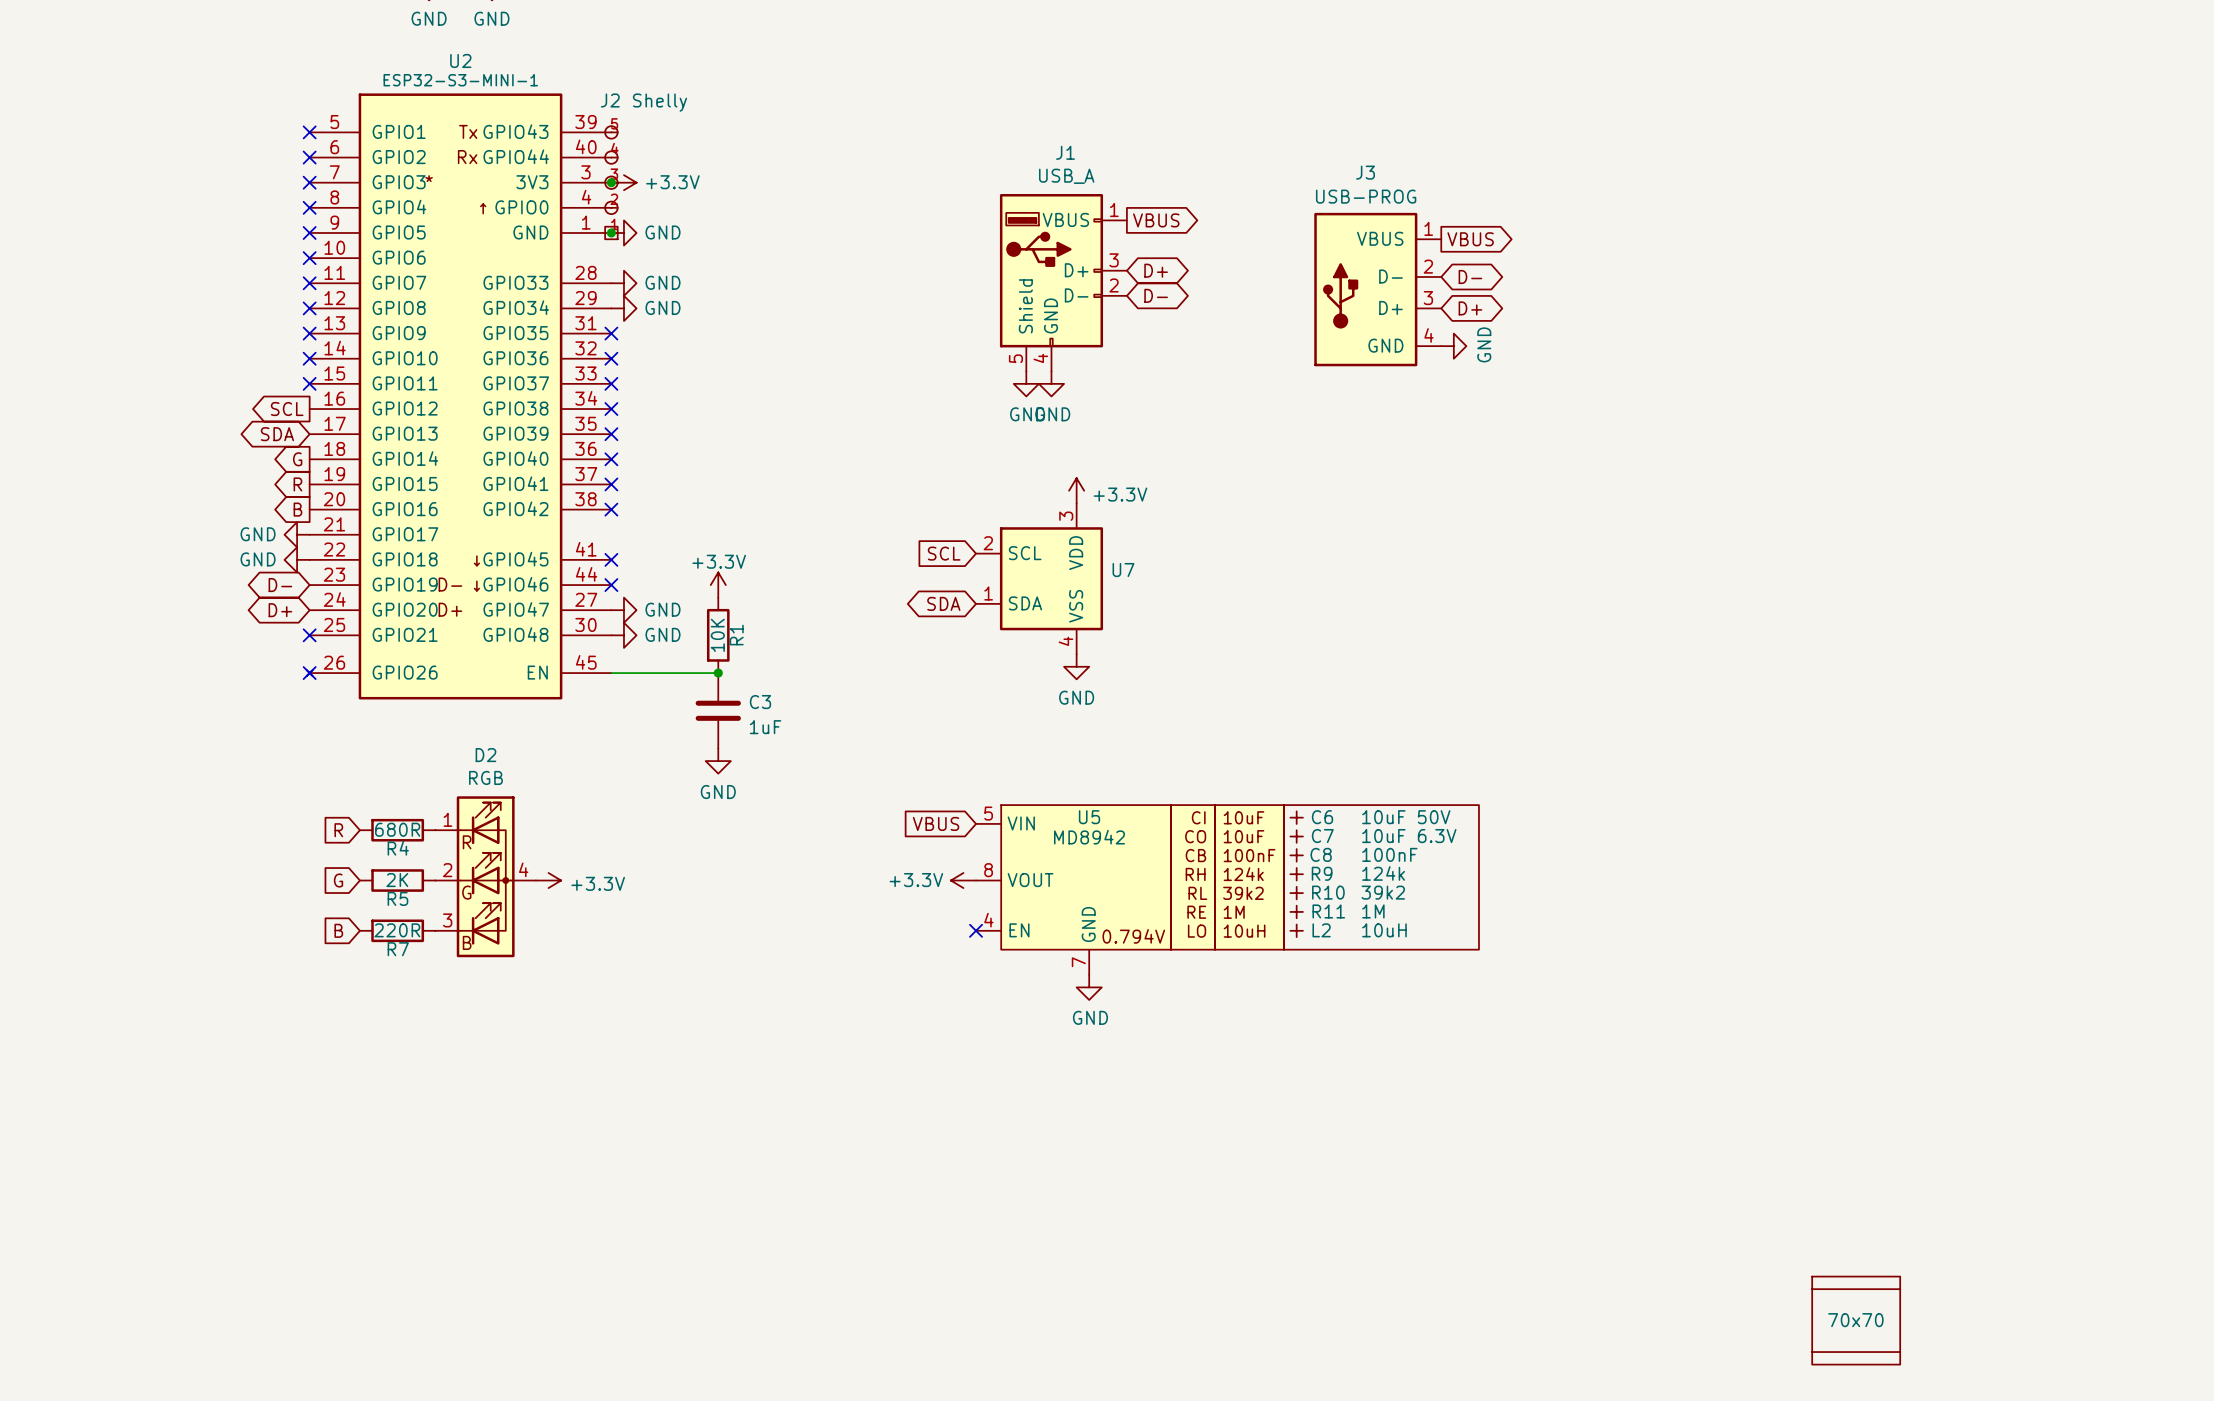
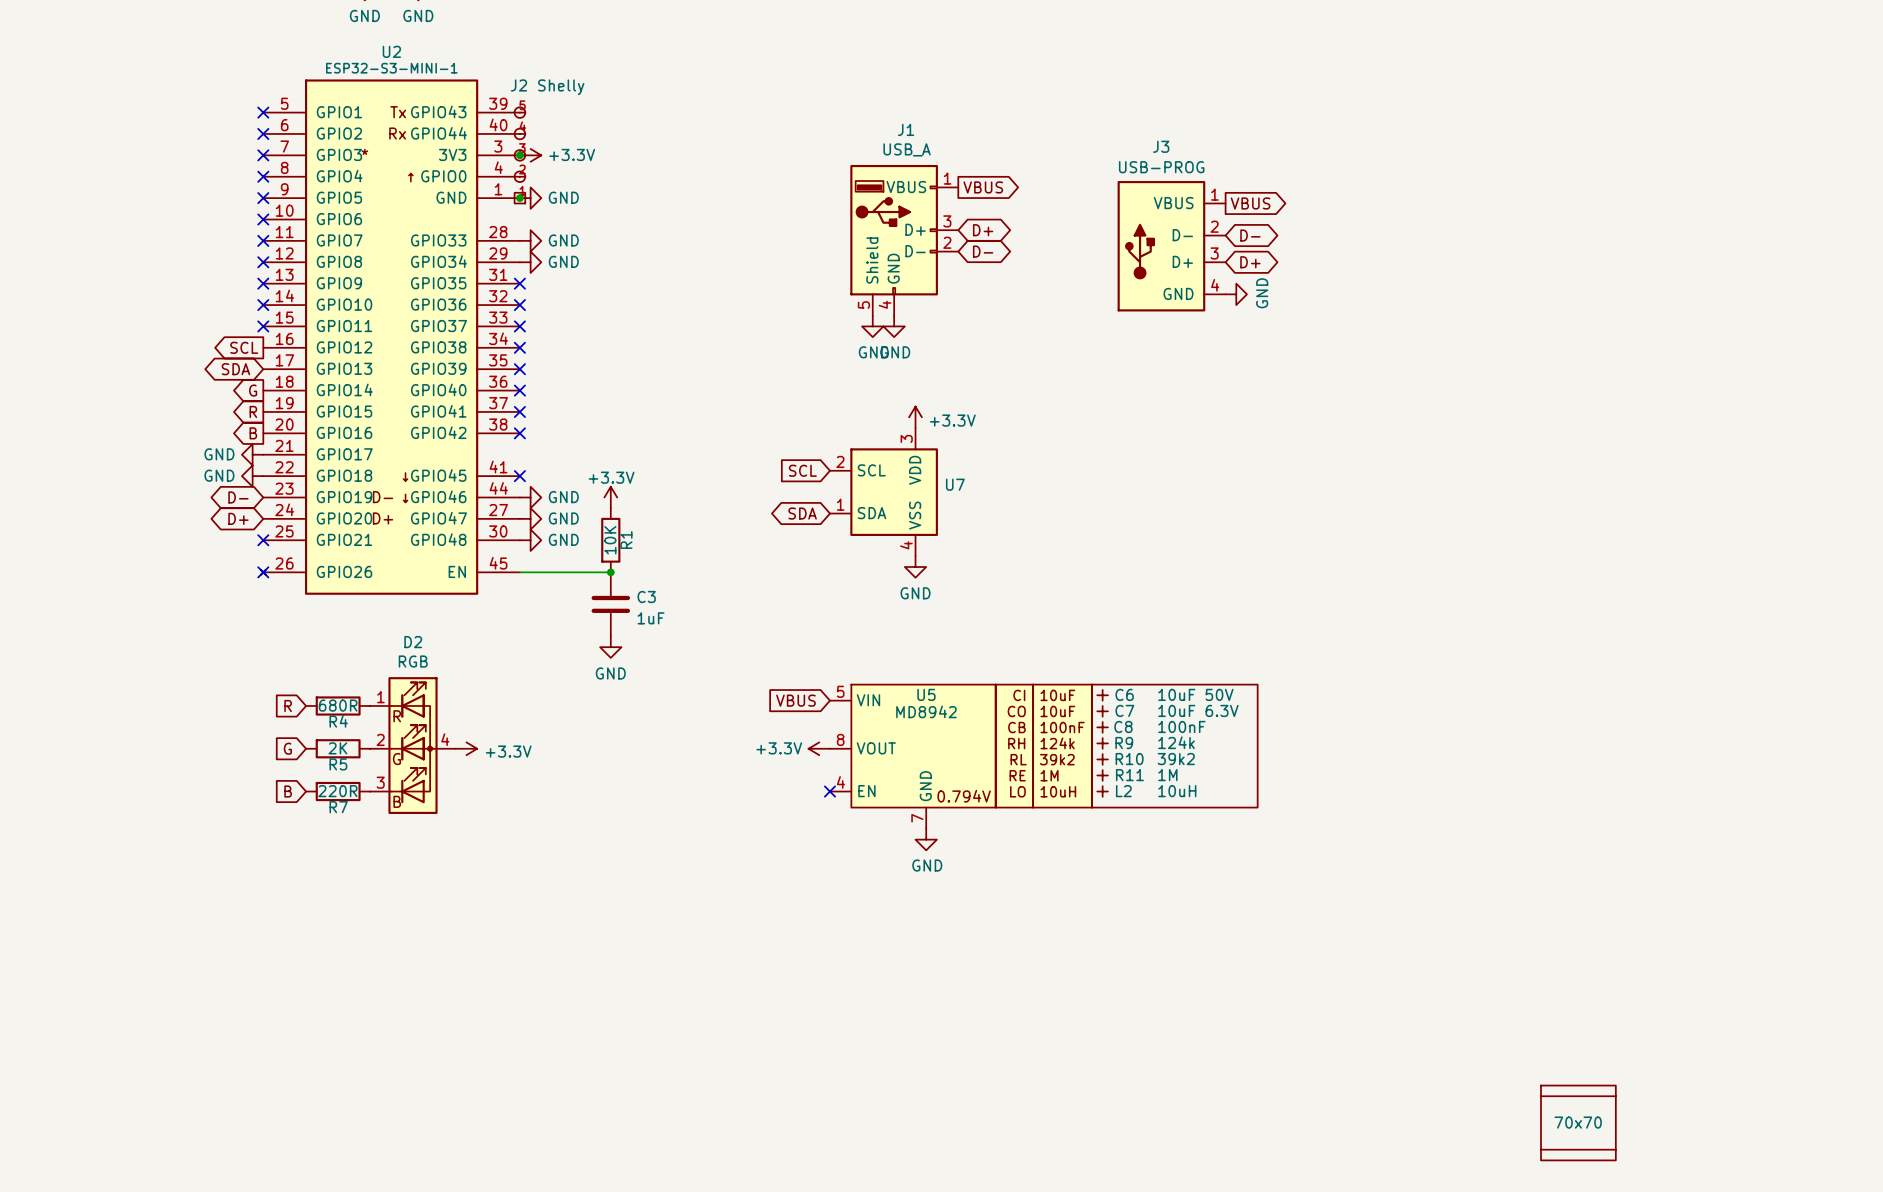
no-connect mark: (611, 585) -> none
power symbol: none -> GND (530, 497)

